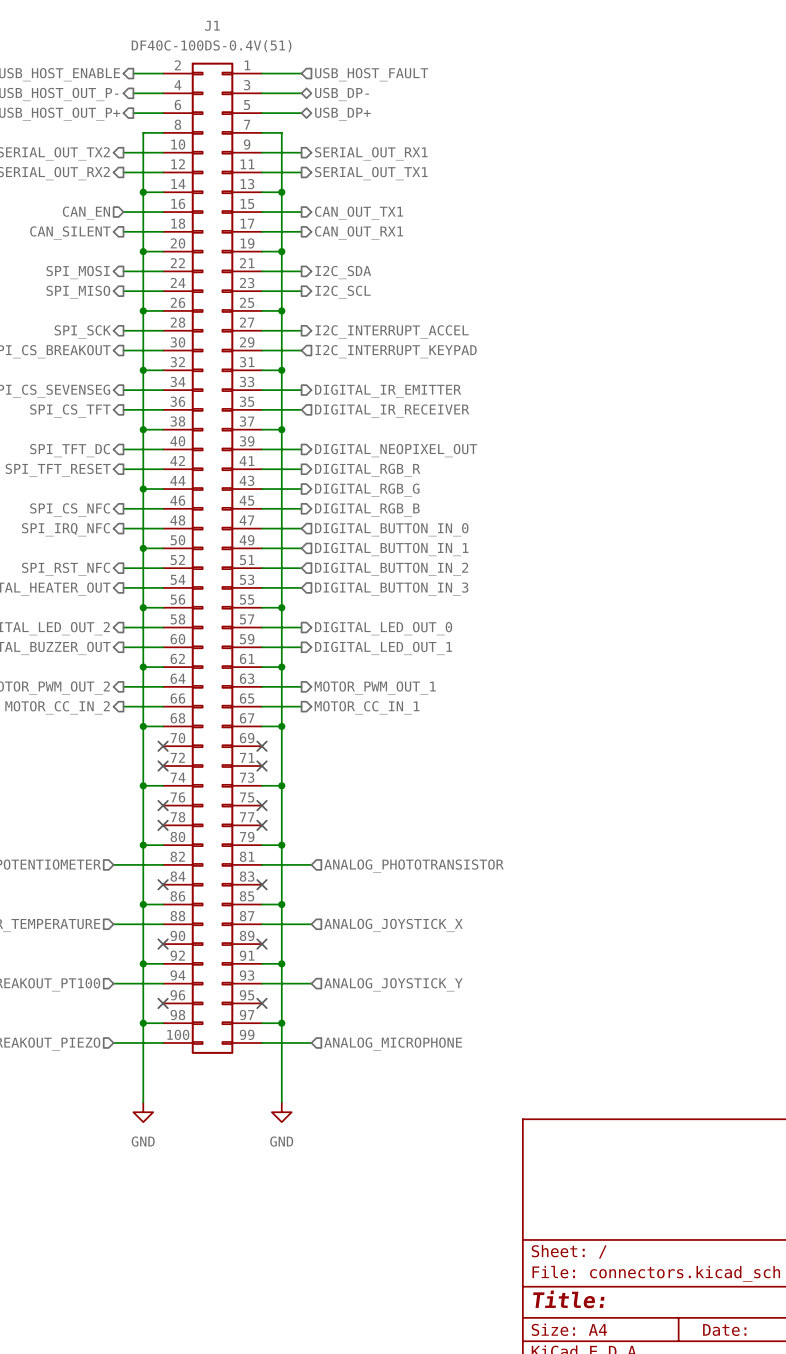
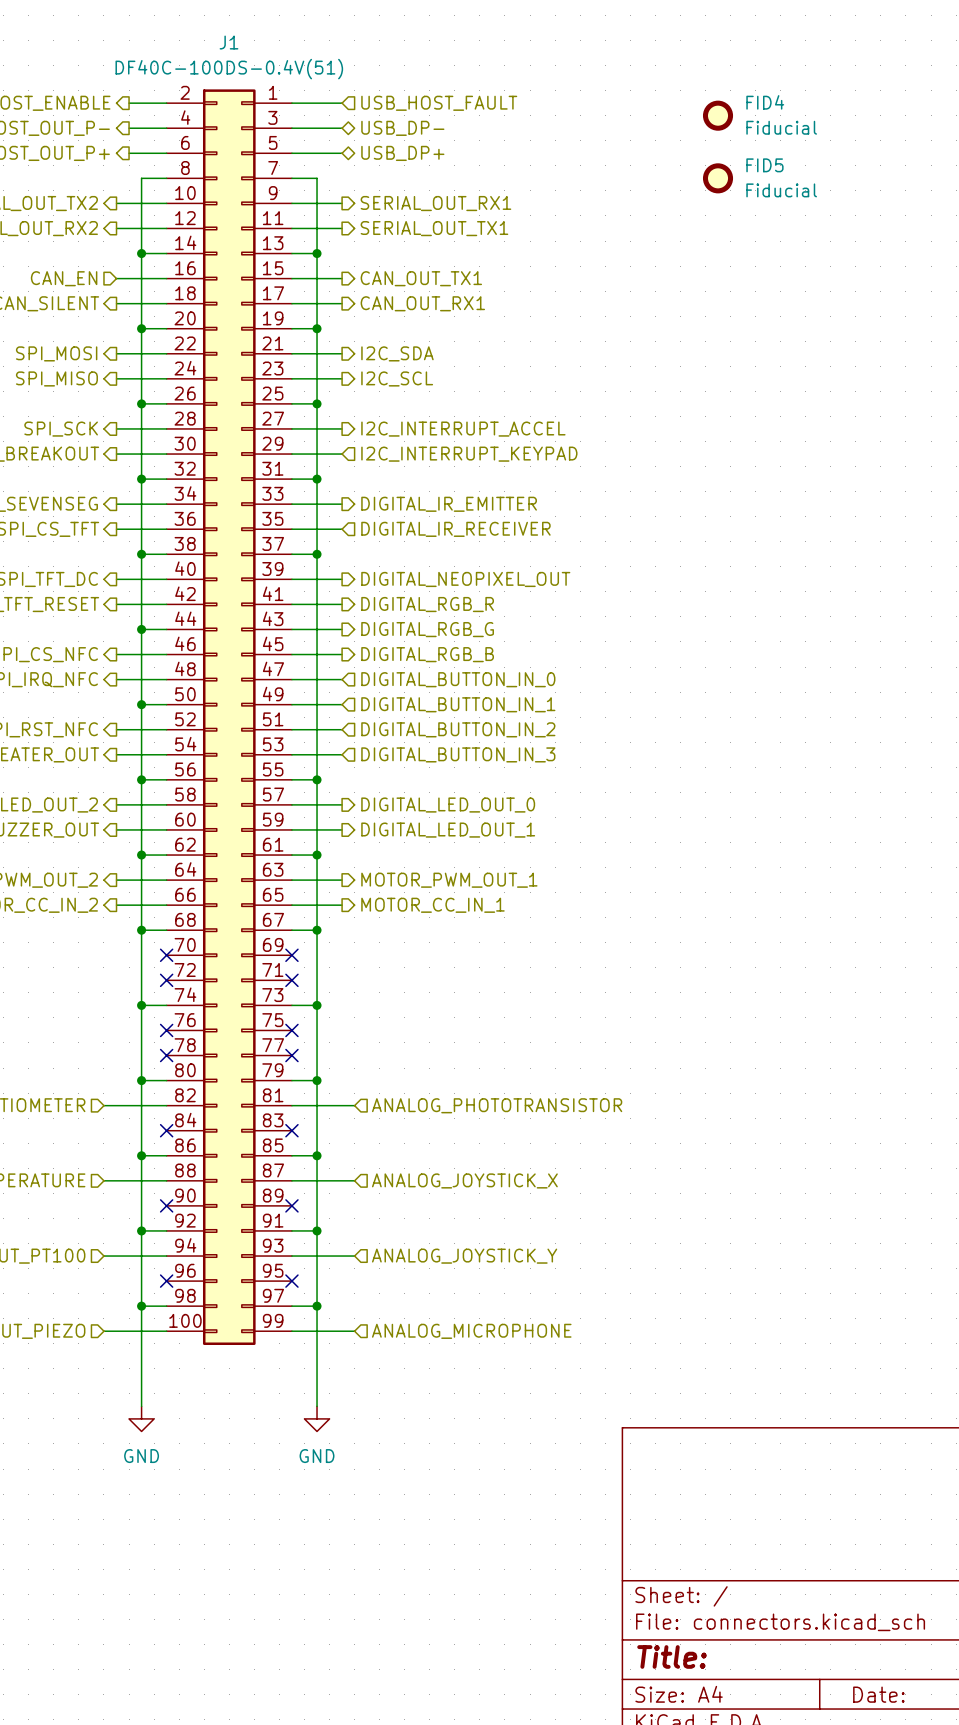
FID4: none -> Fiducial (718, 115)
FID5: none -> Fiducial (718, 178)

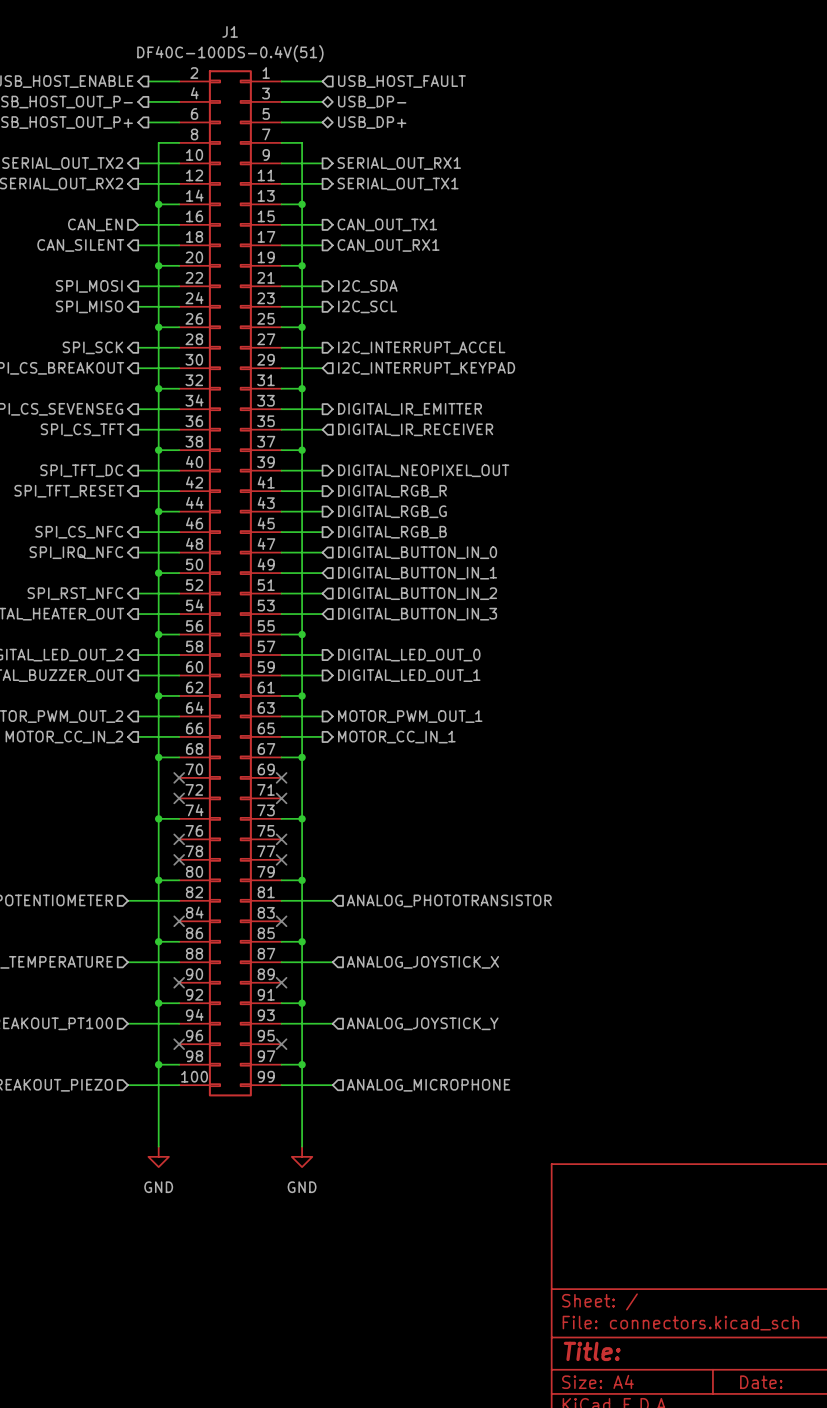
FID4: Fiducial (718, 115) -> none
FID5: Fiducial (718, 178) -> none

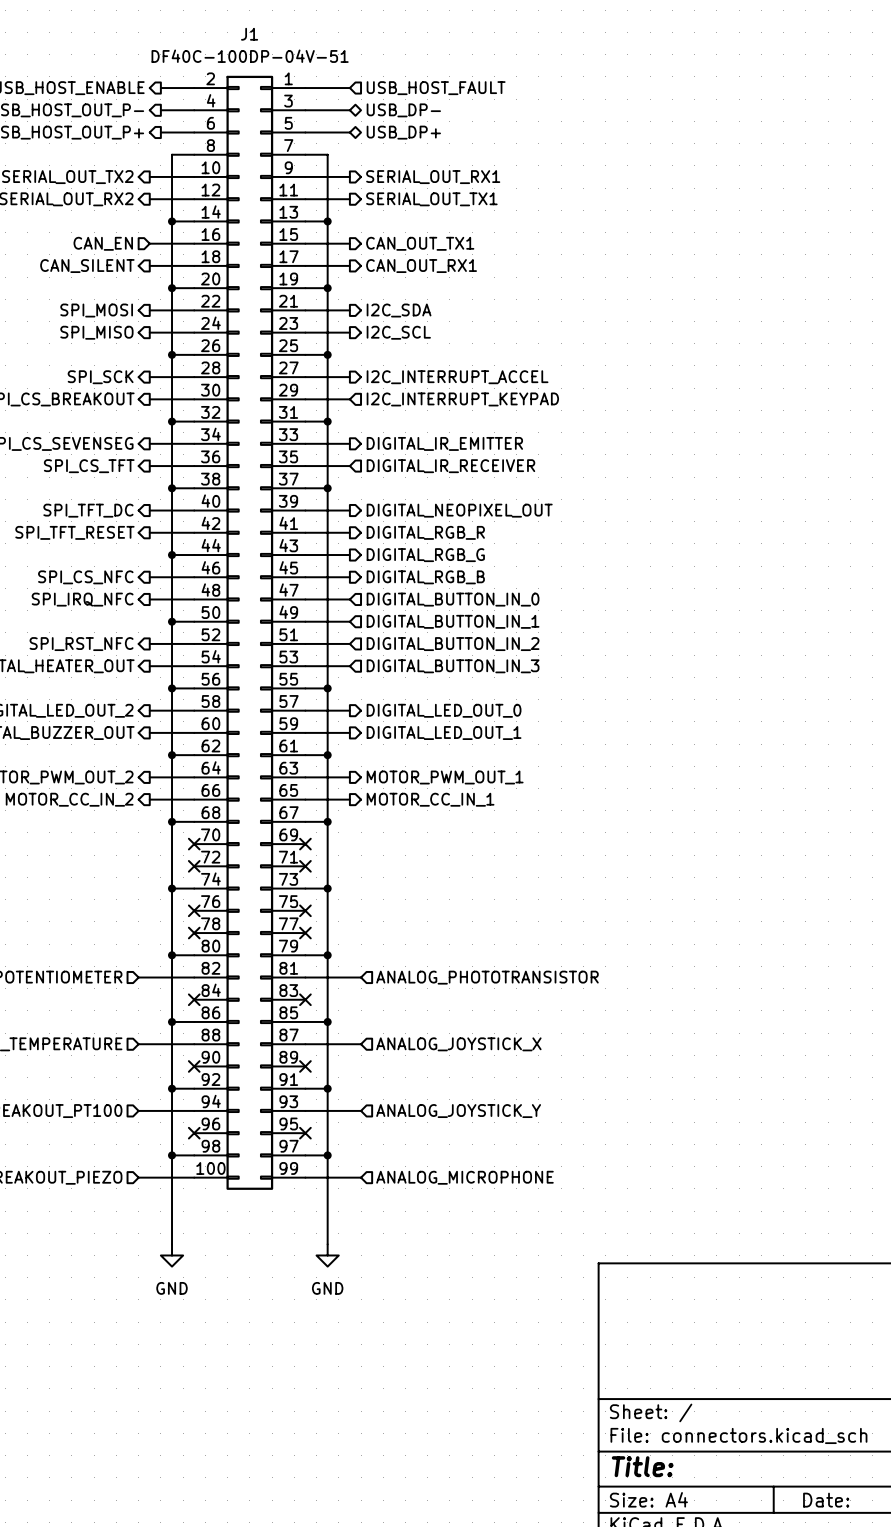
J1 value: DF40C-100DS-0.4V(51) (230, 53) -> DF40C-100DP-04V-51 (250, 56)

